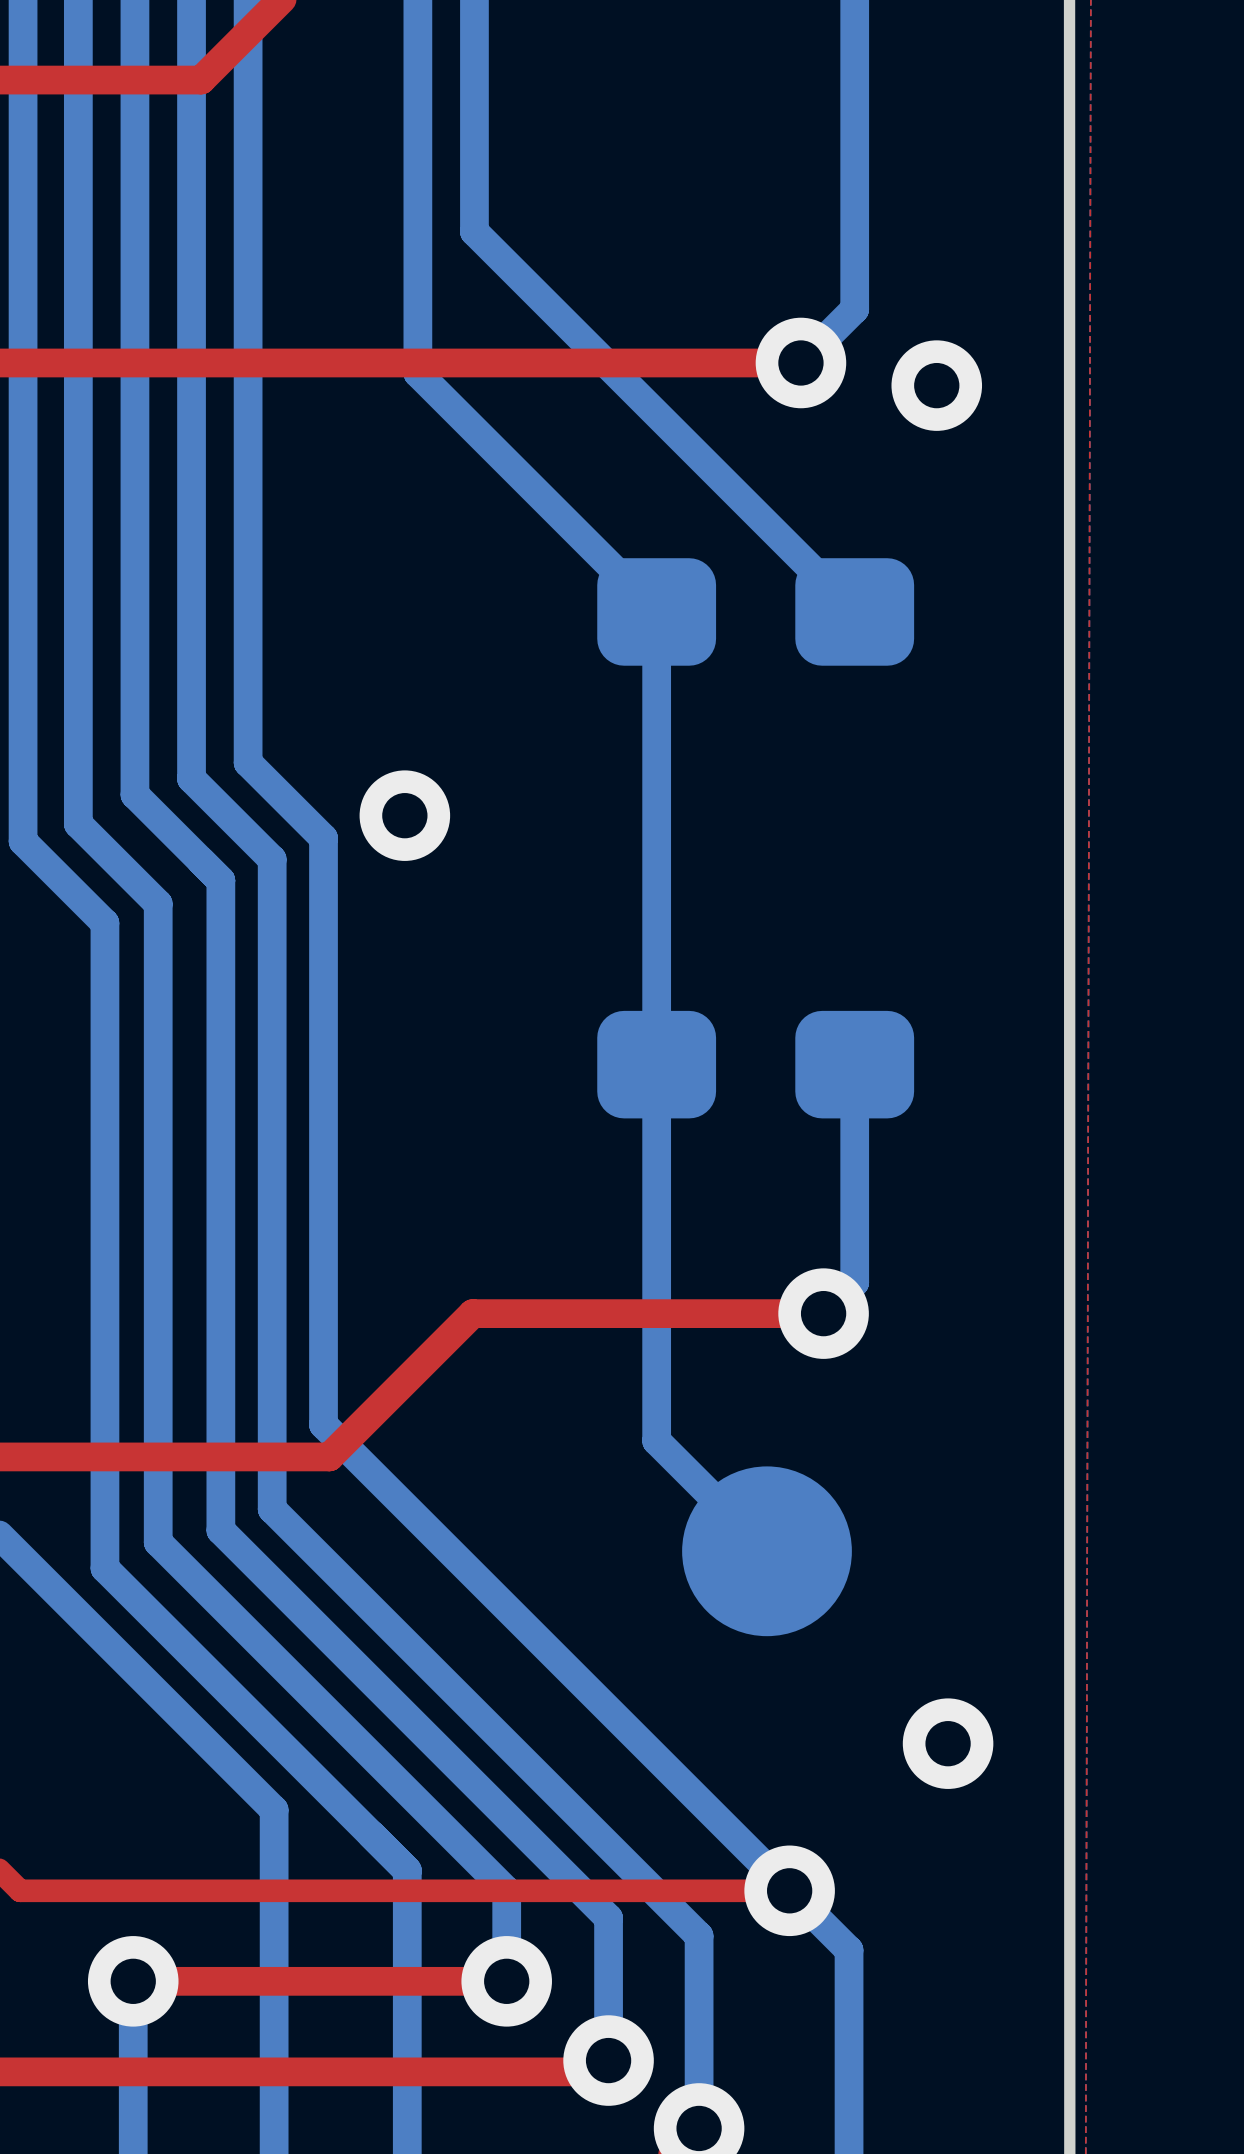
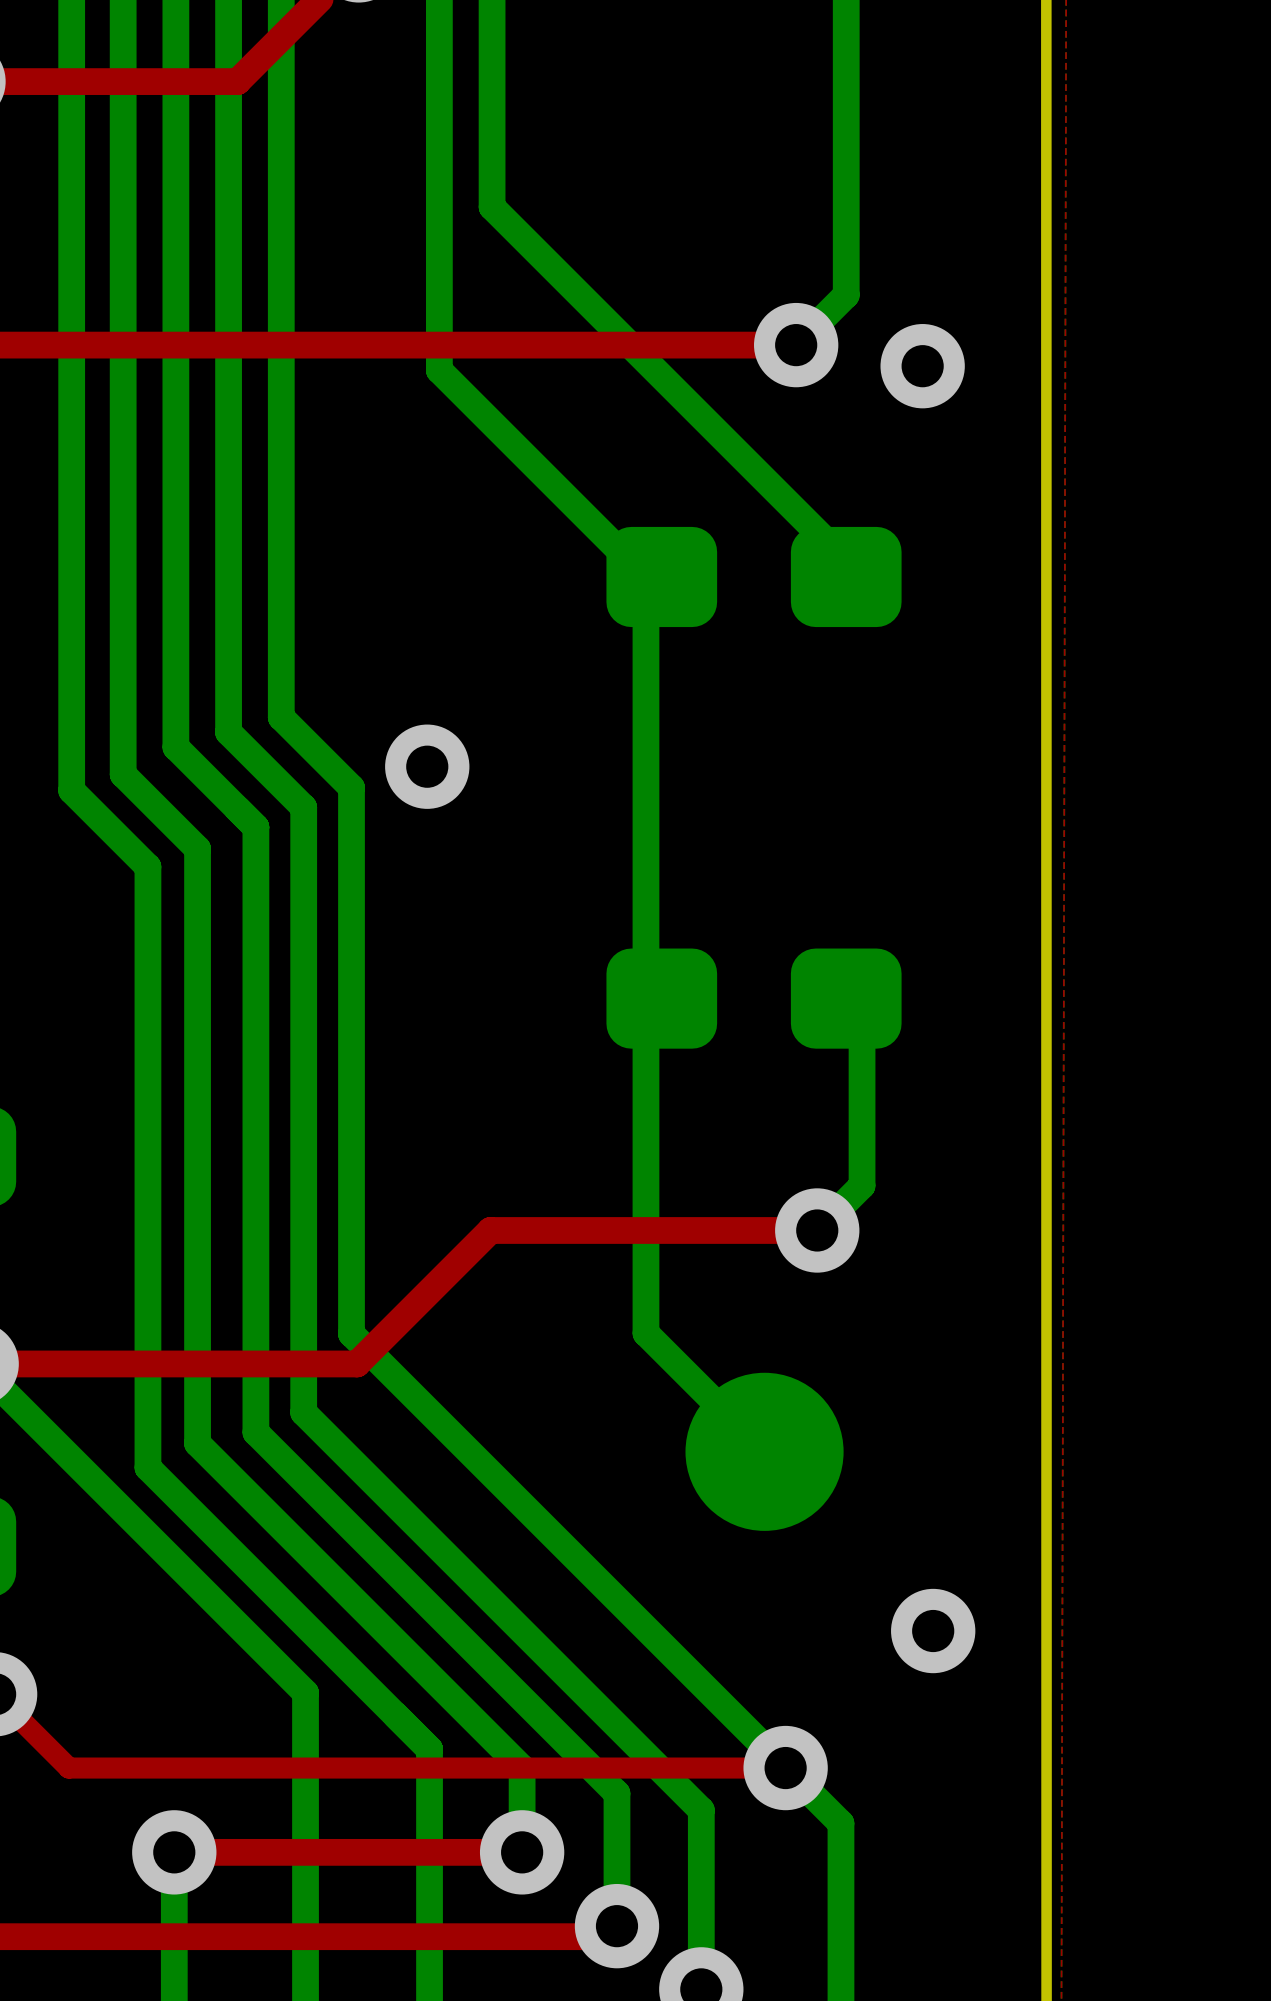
bottom track: (474, 214) (474, 231) (854, 611) -> (492, 207) (862, 576)
bottom track: (417, 373) (656, 611) (656, 1440) -> (439, 354) (439, 370) (645, 576) (645, 1333) (661, 1349)
bottom track: (854, 1064) (854, 1282) -> (862, 998) (862, 1185) (846, 1201)

